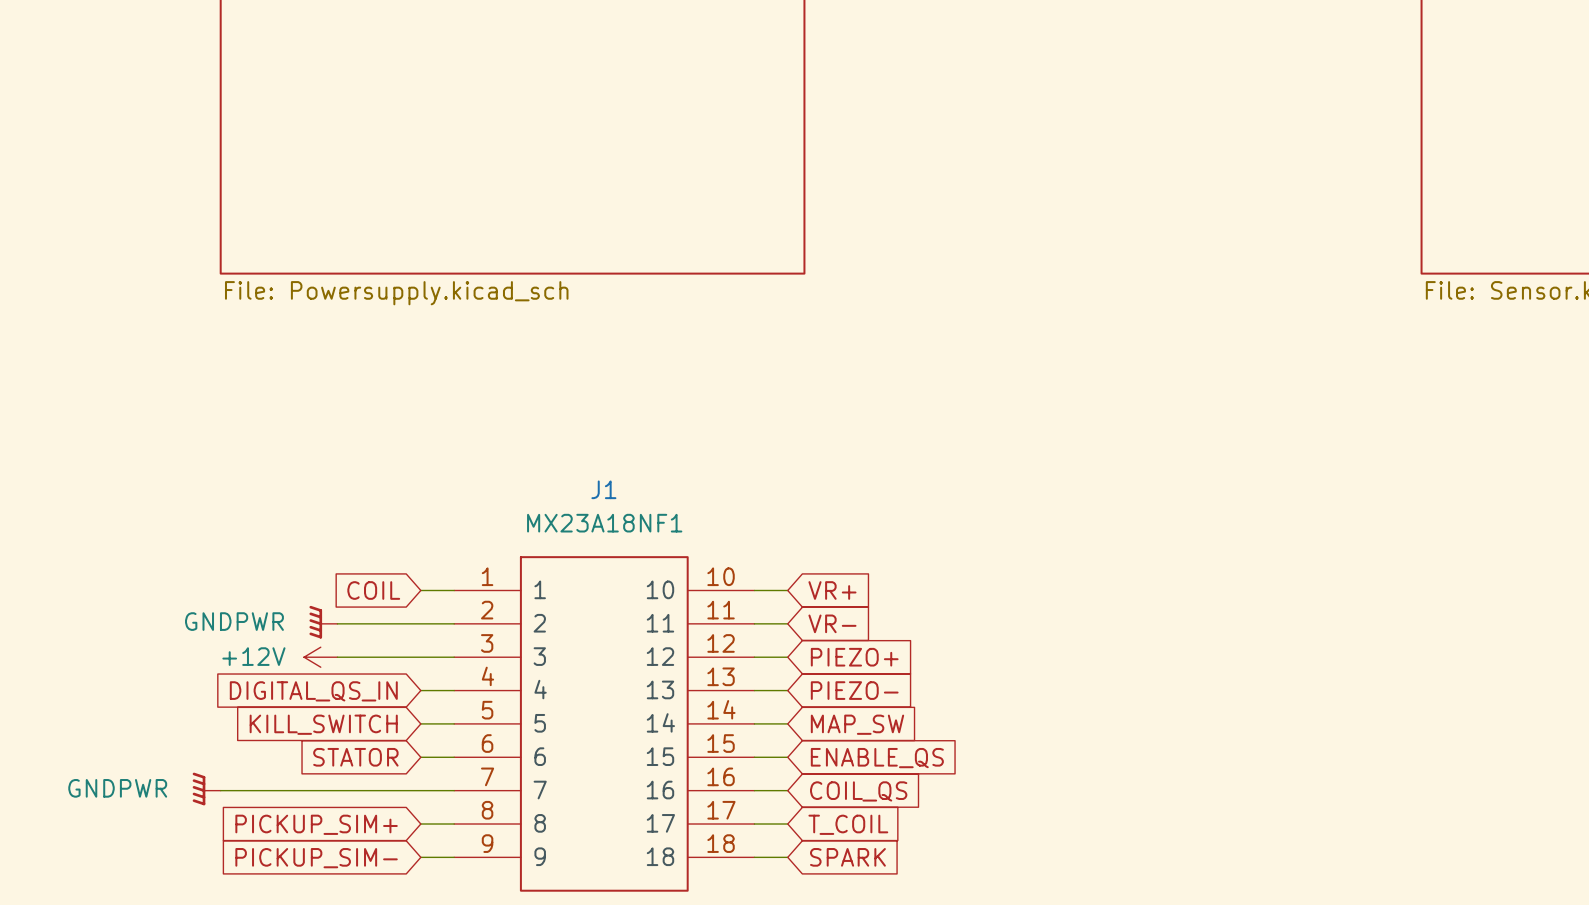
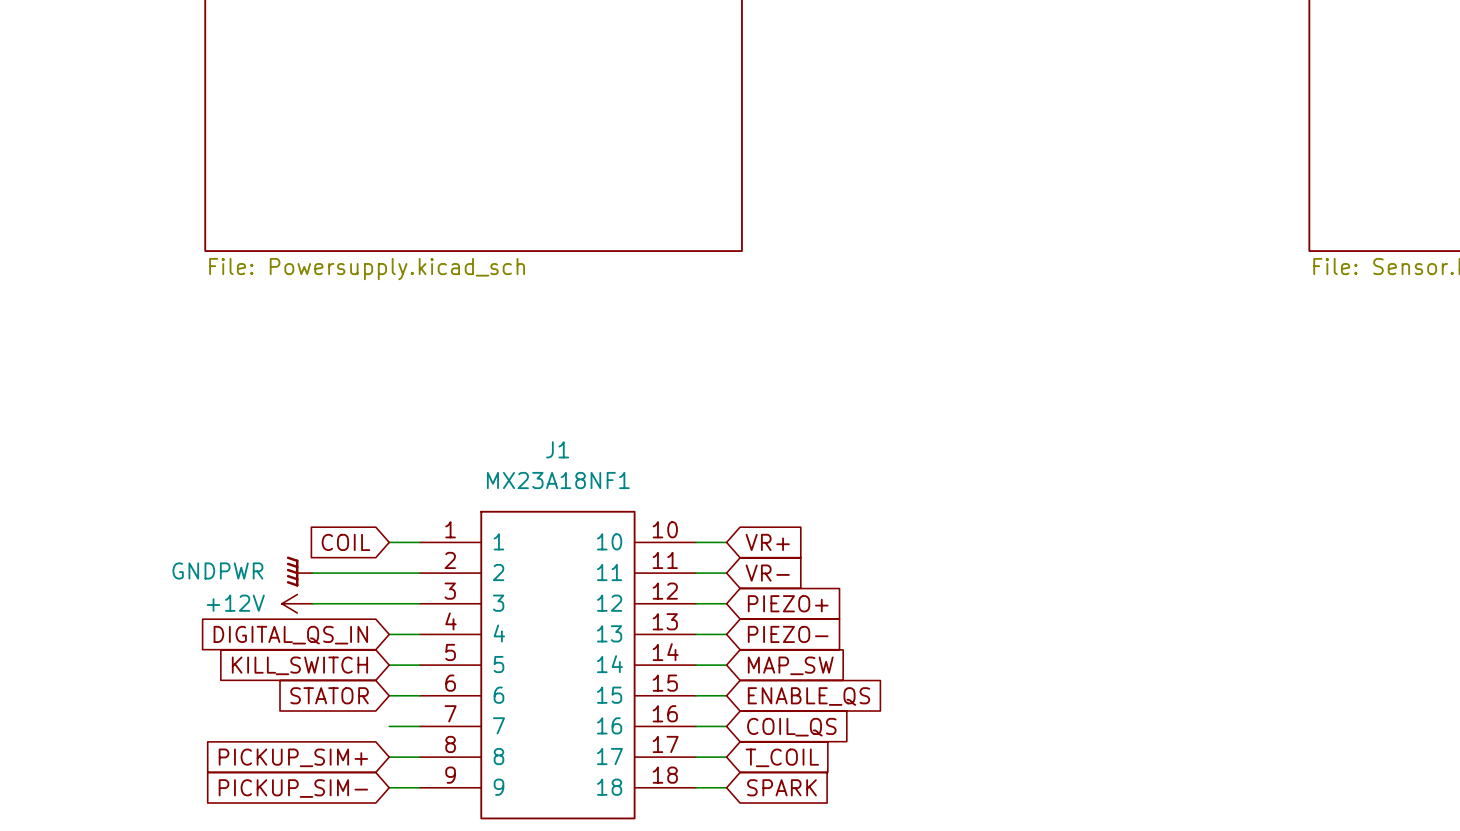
power symbol: GNDPWR (206, 788) -> none
wire: (220, 790) (420, 790) -> none

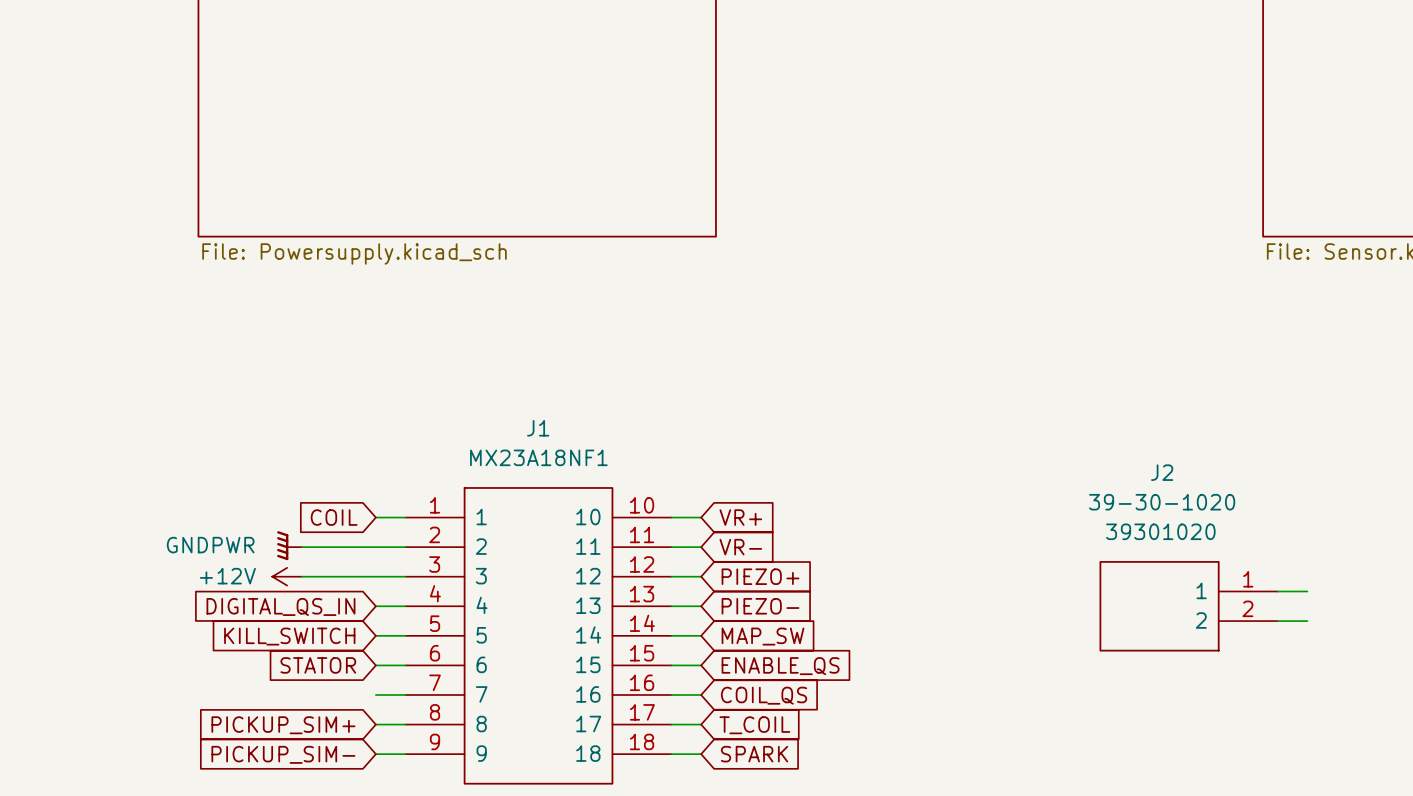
wire: none -> (1277, 591) (1307, 591)
J2: none -> 39-30-1020 (1188, 606)
wire: none -> (1277, 621) (1307, 621)

